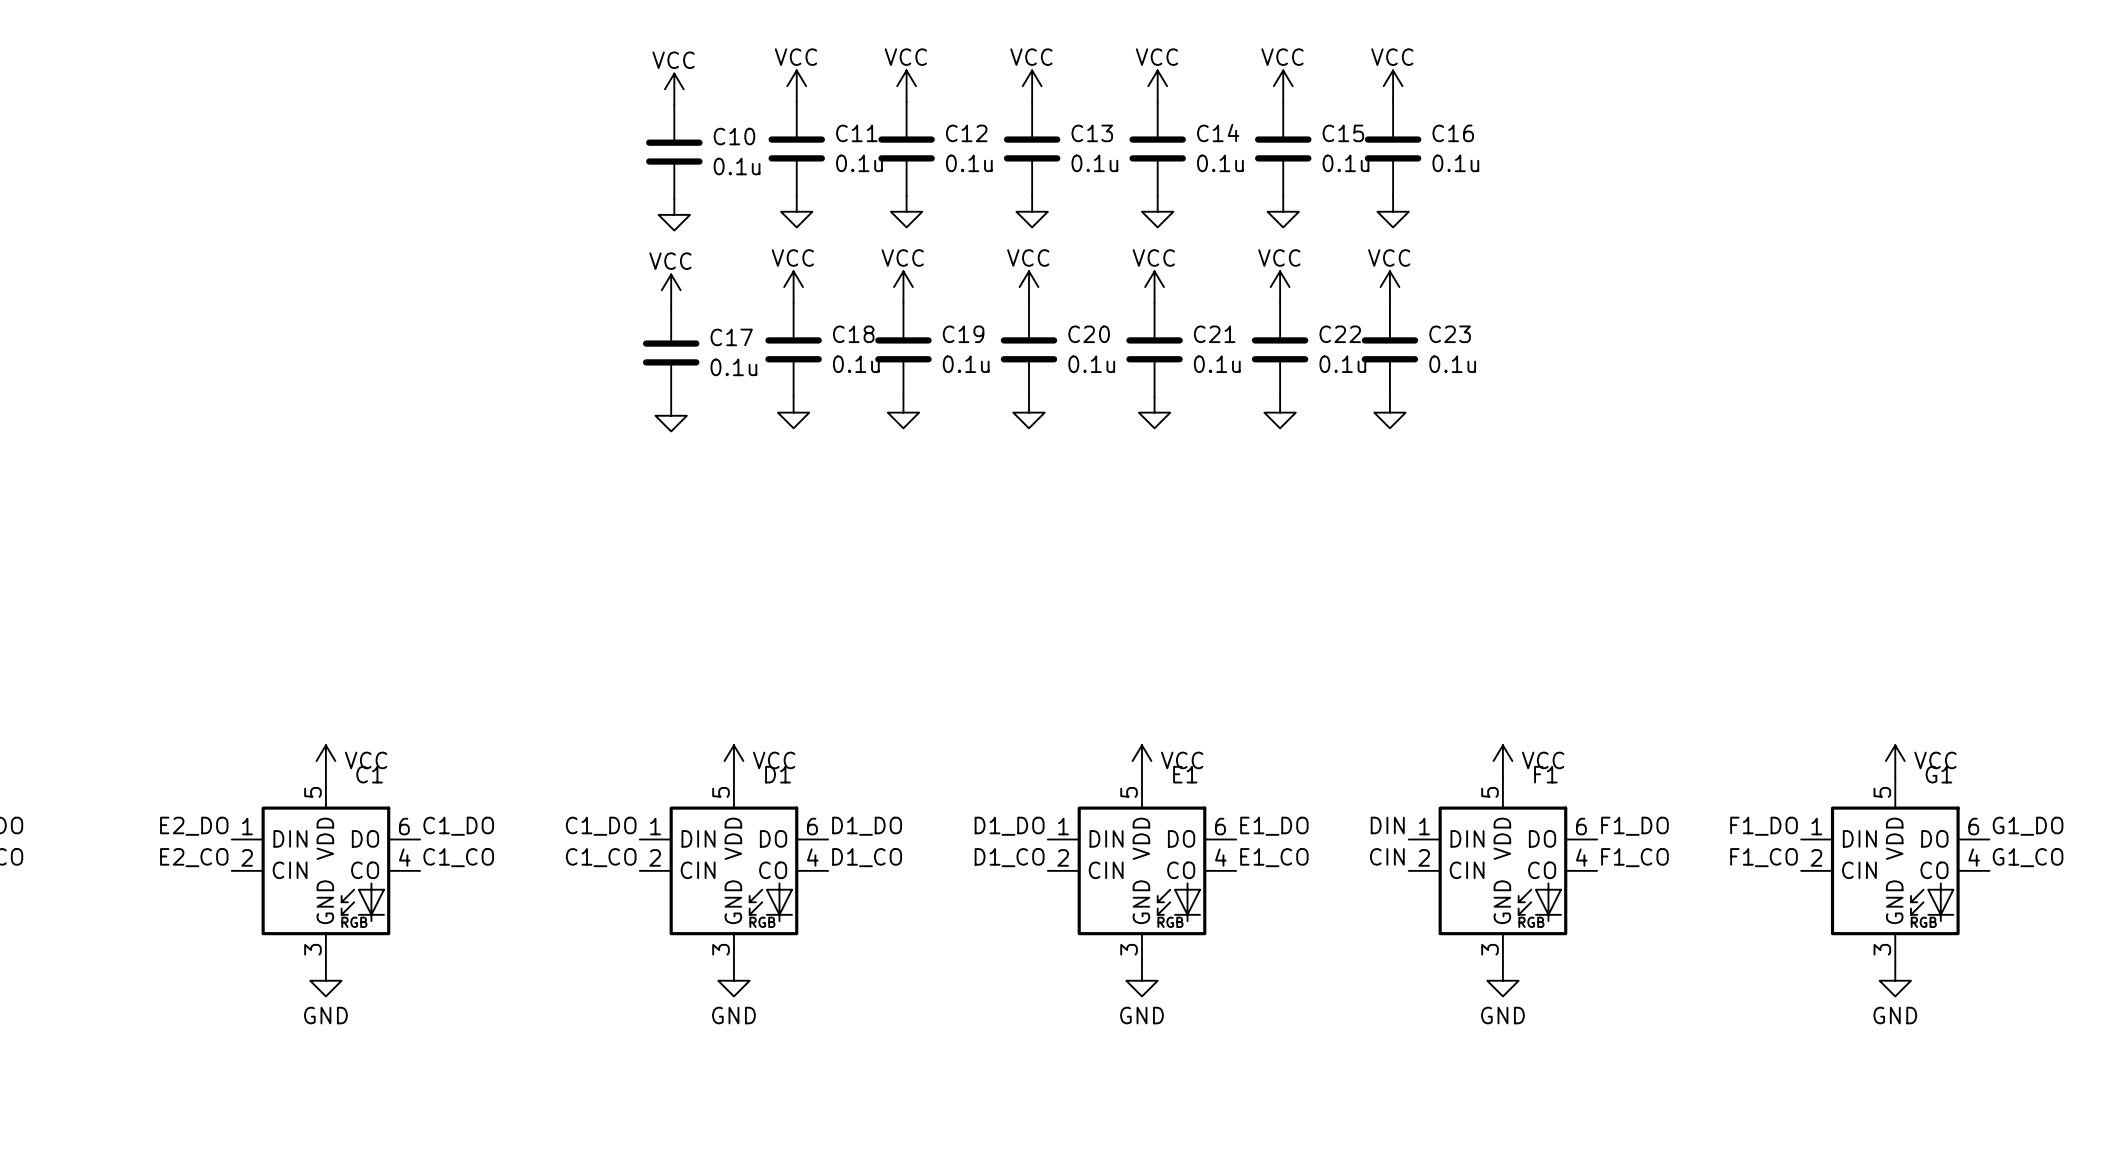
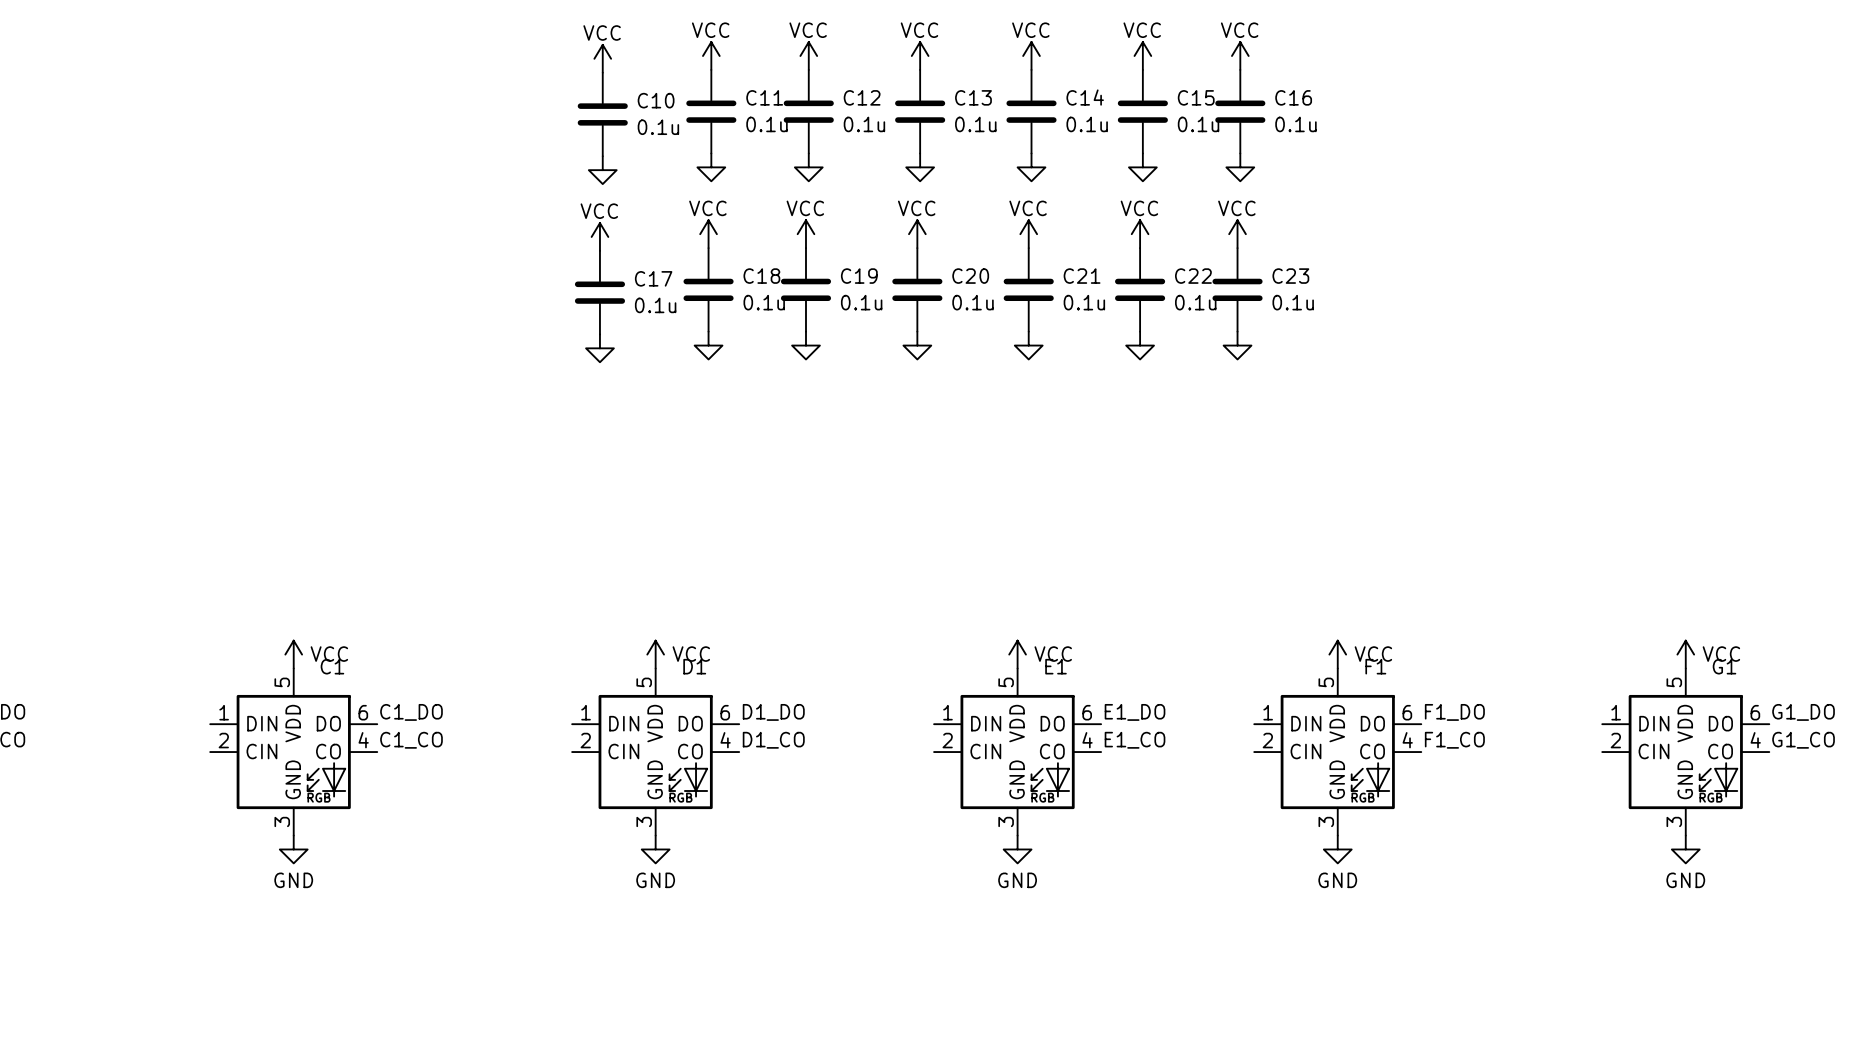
label: DIN (1387, 825) -> none
label: E2_DO (194, 826) -> none
label: C1_DO (601, 826) -> none
label: D1_DO (1009, 826) -> none
label: F1_DO (1764, 826) -> none
label: CIN (1387, 856) -> none
label: E2_CO (194, 857) -> none
label: C1_CO (601, 857) -> none
label: D1_CO (1009, 857) -> none
label: F1_CO (1764, 857) -> none

